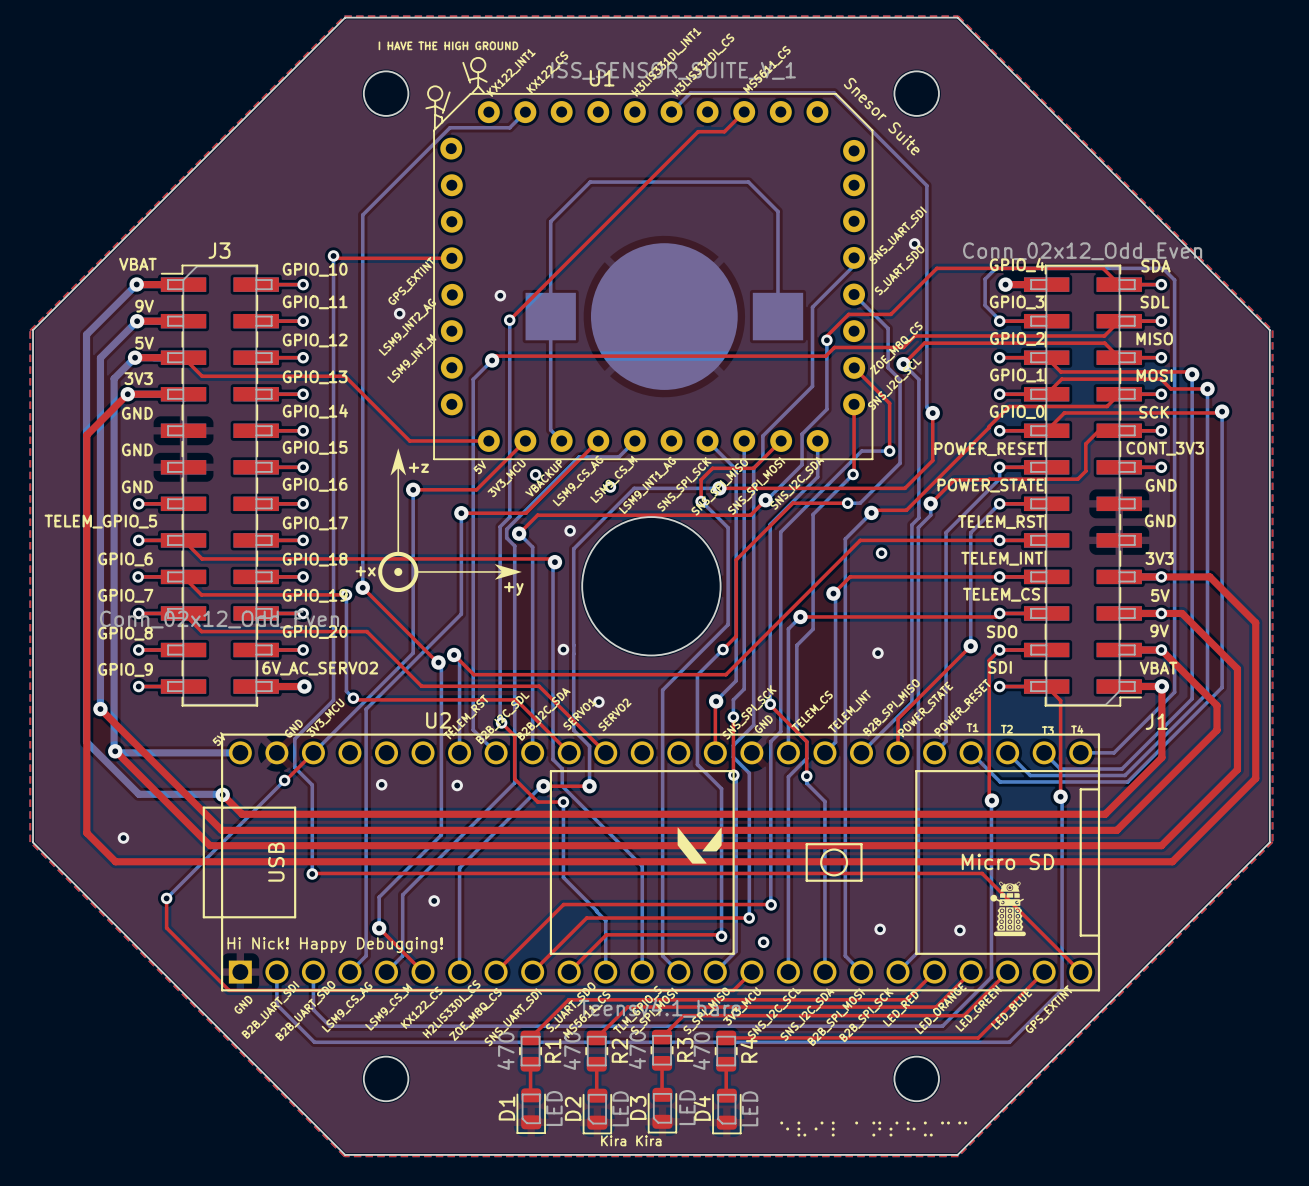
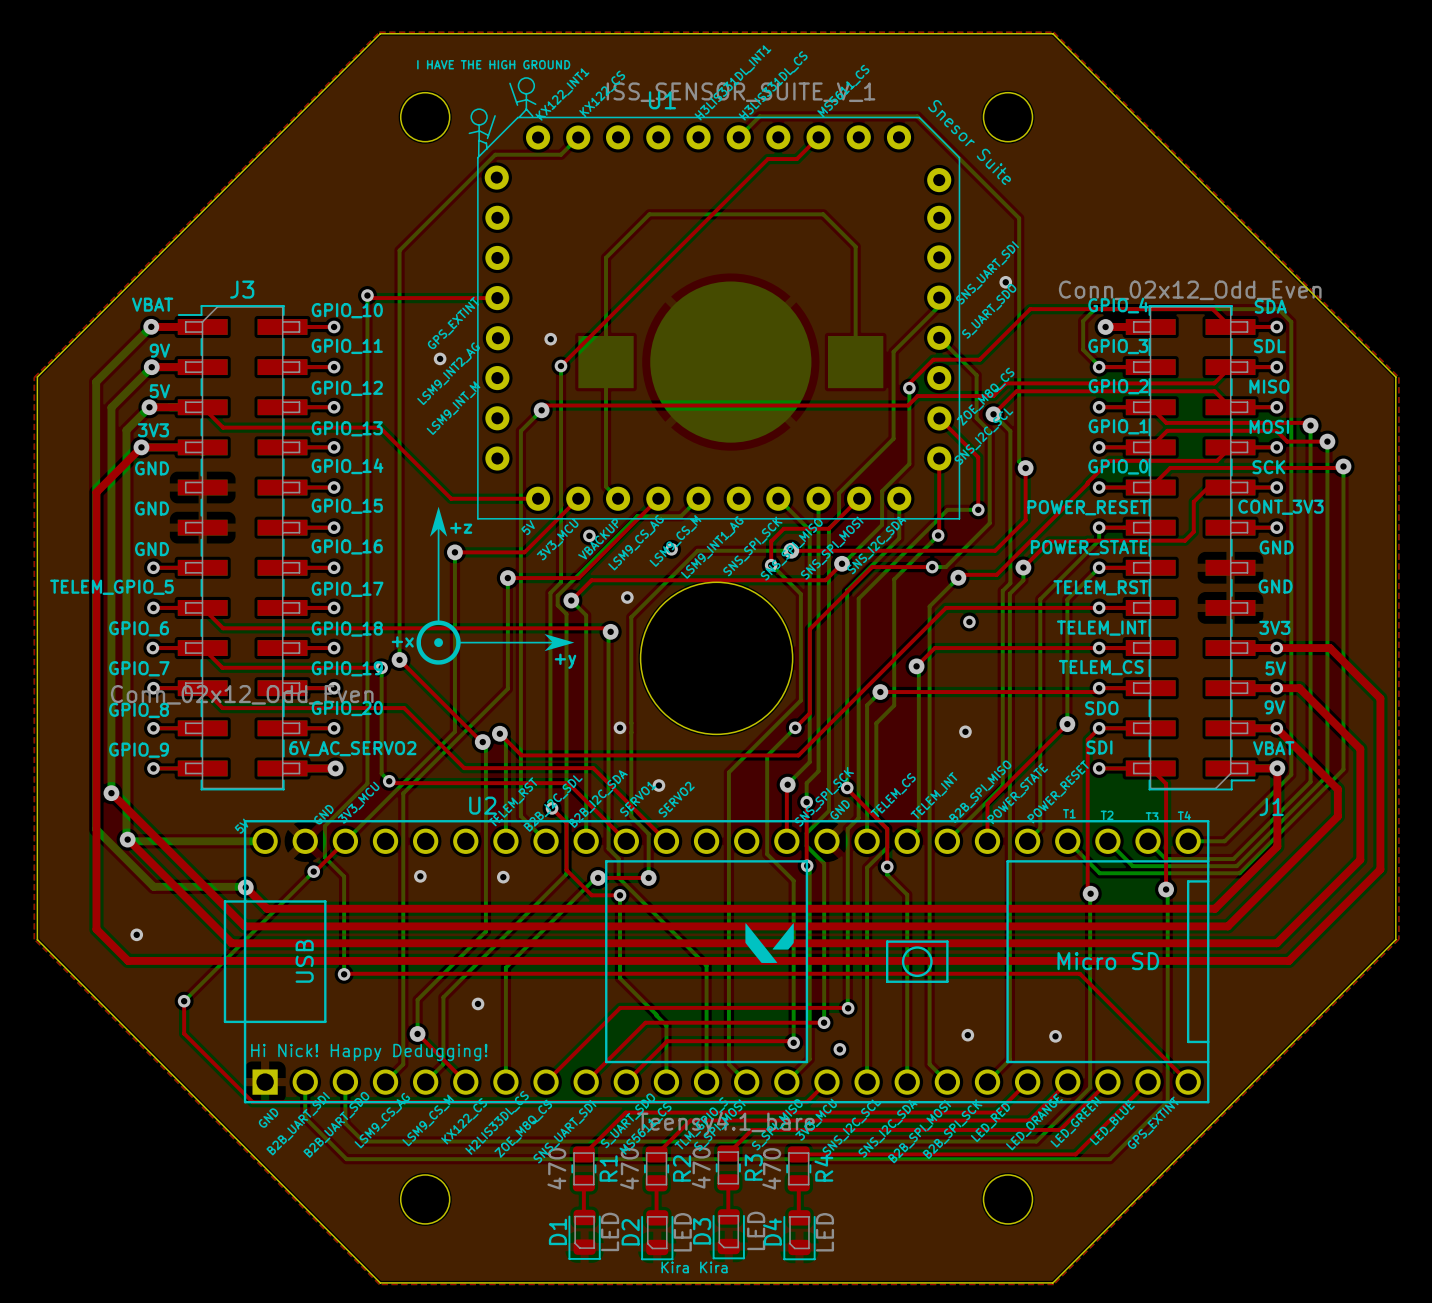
drawing: [990, 881, 1026, 937] -> none
text: Hi Nick! Happy Debugging! (335, 945) -> Hi Nick! Happy Dedugging! (369, 1052)
drawing: [780, 1121, 968, 1137] -> none

